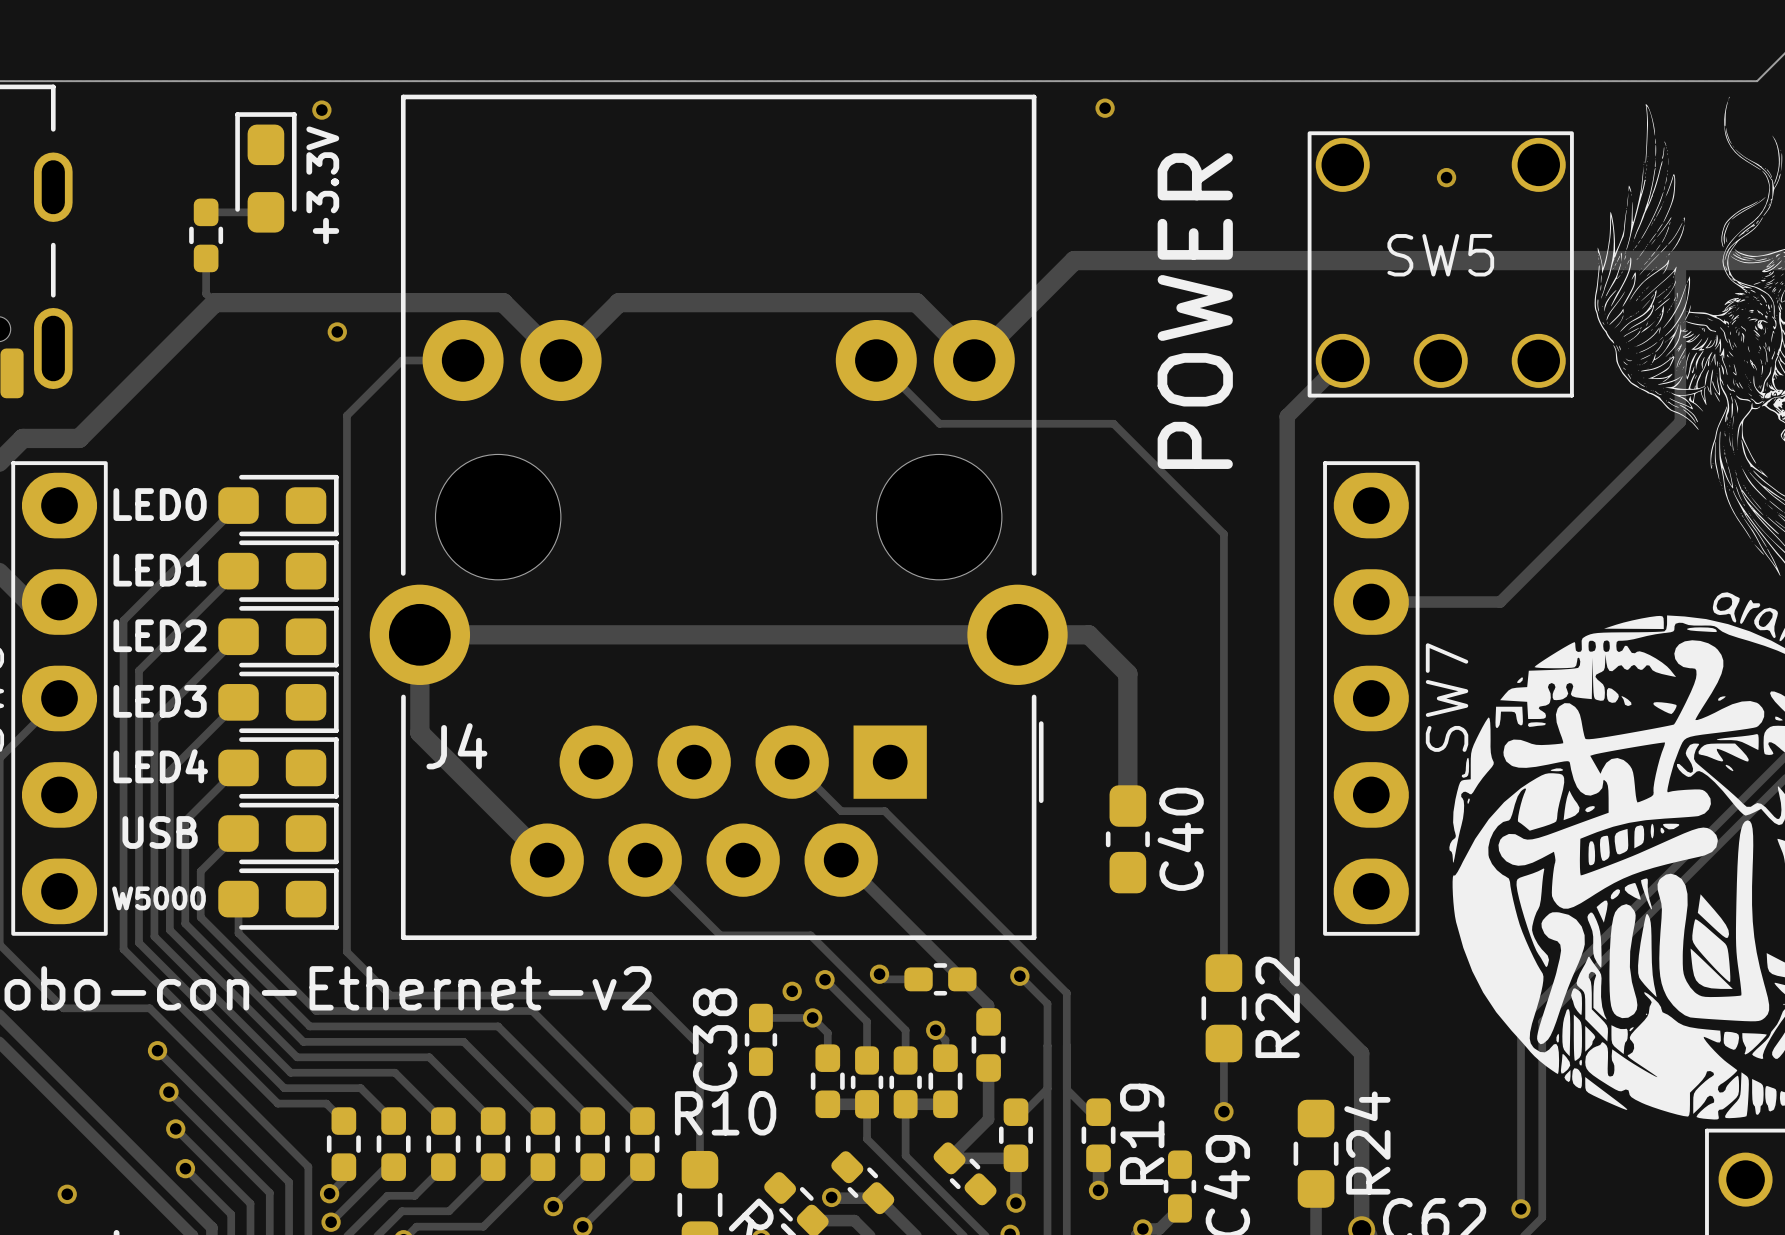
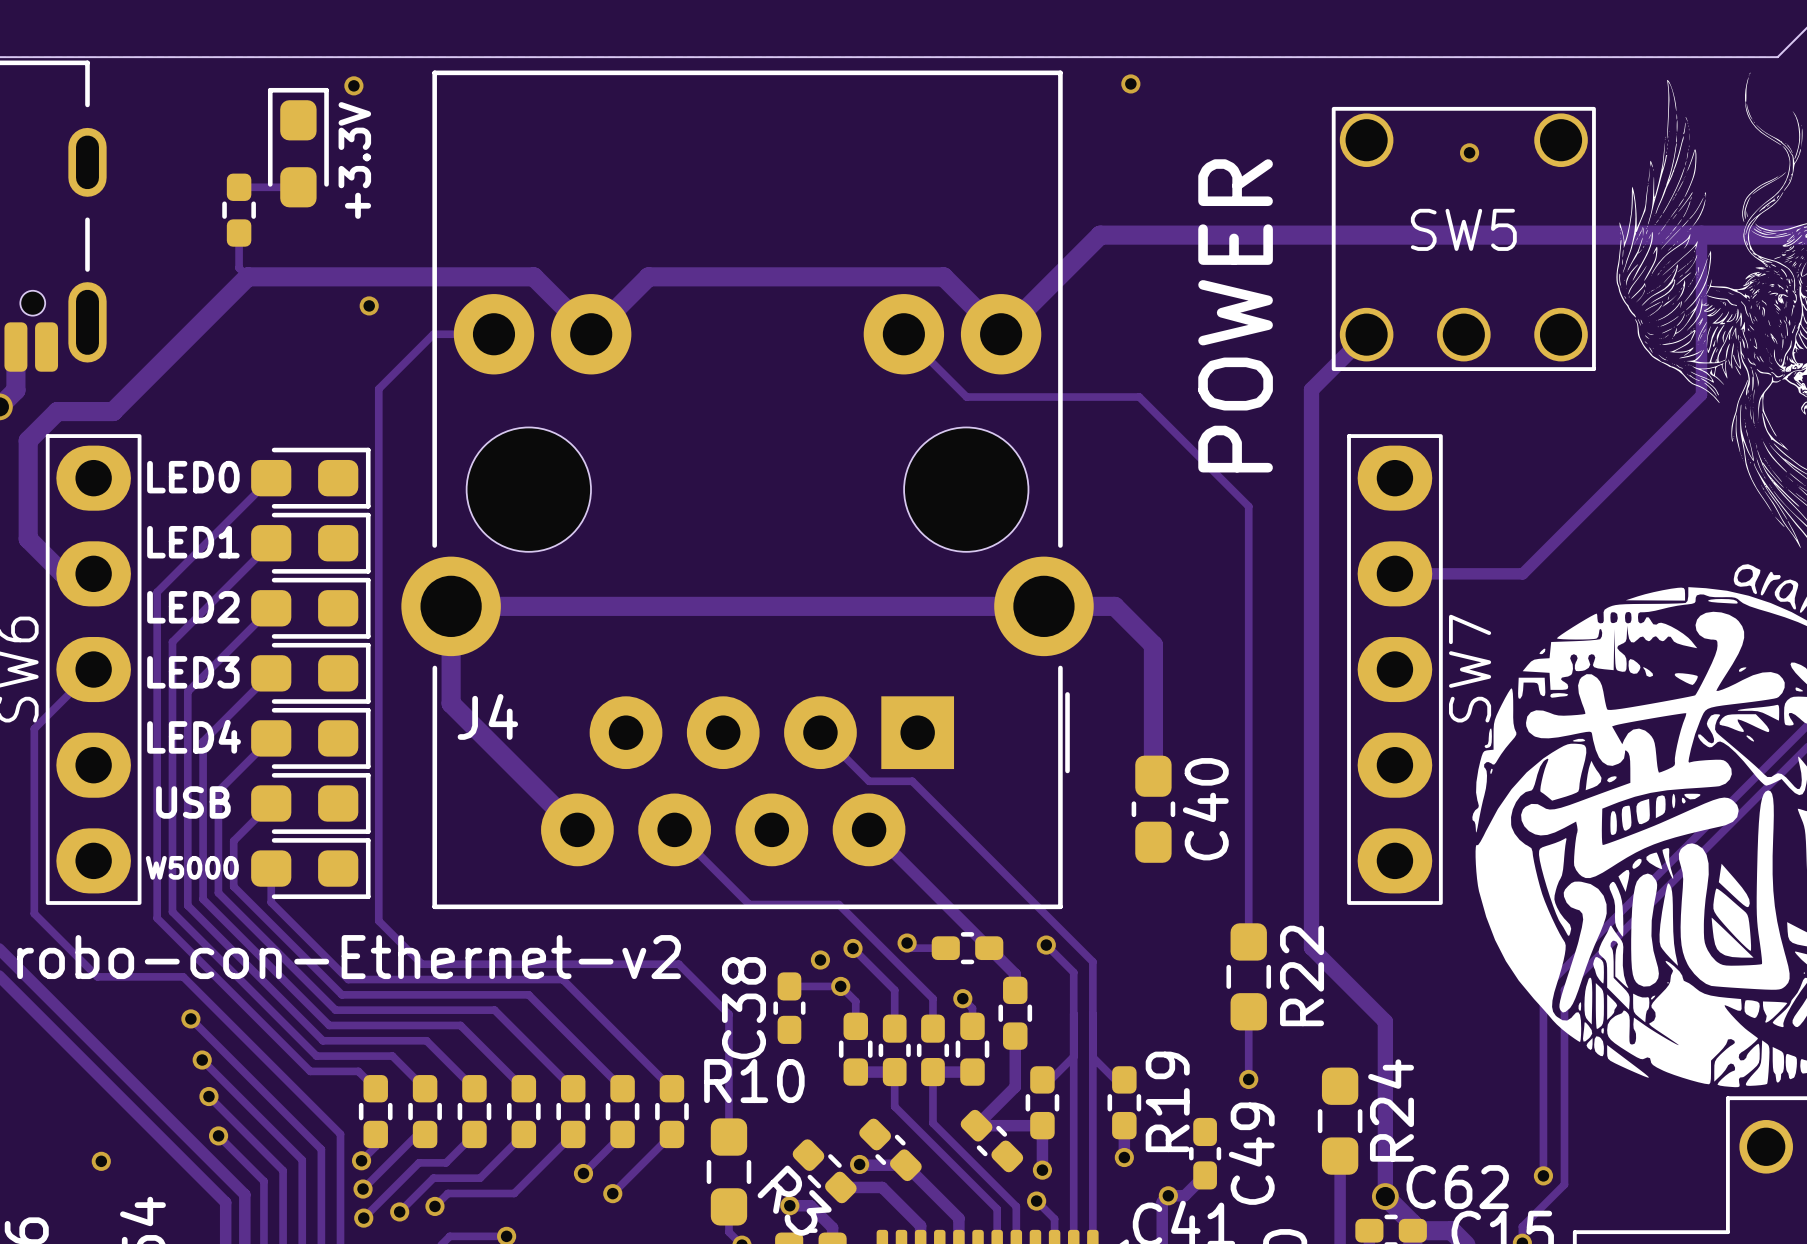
text position: POWER (1195, 311) -> POWER (1235, 315)

